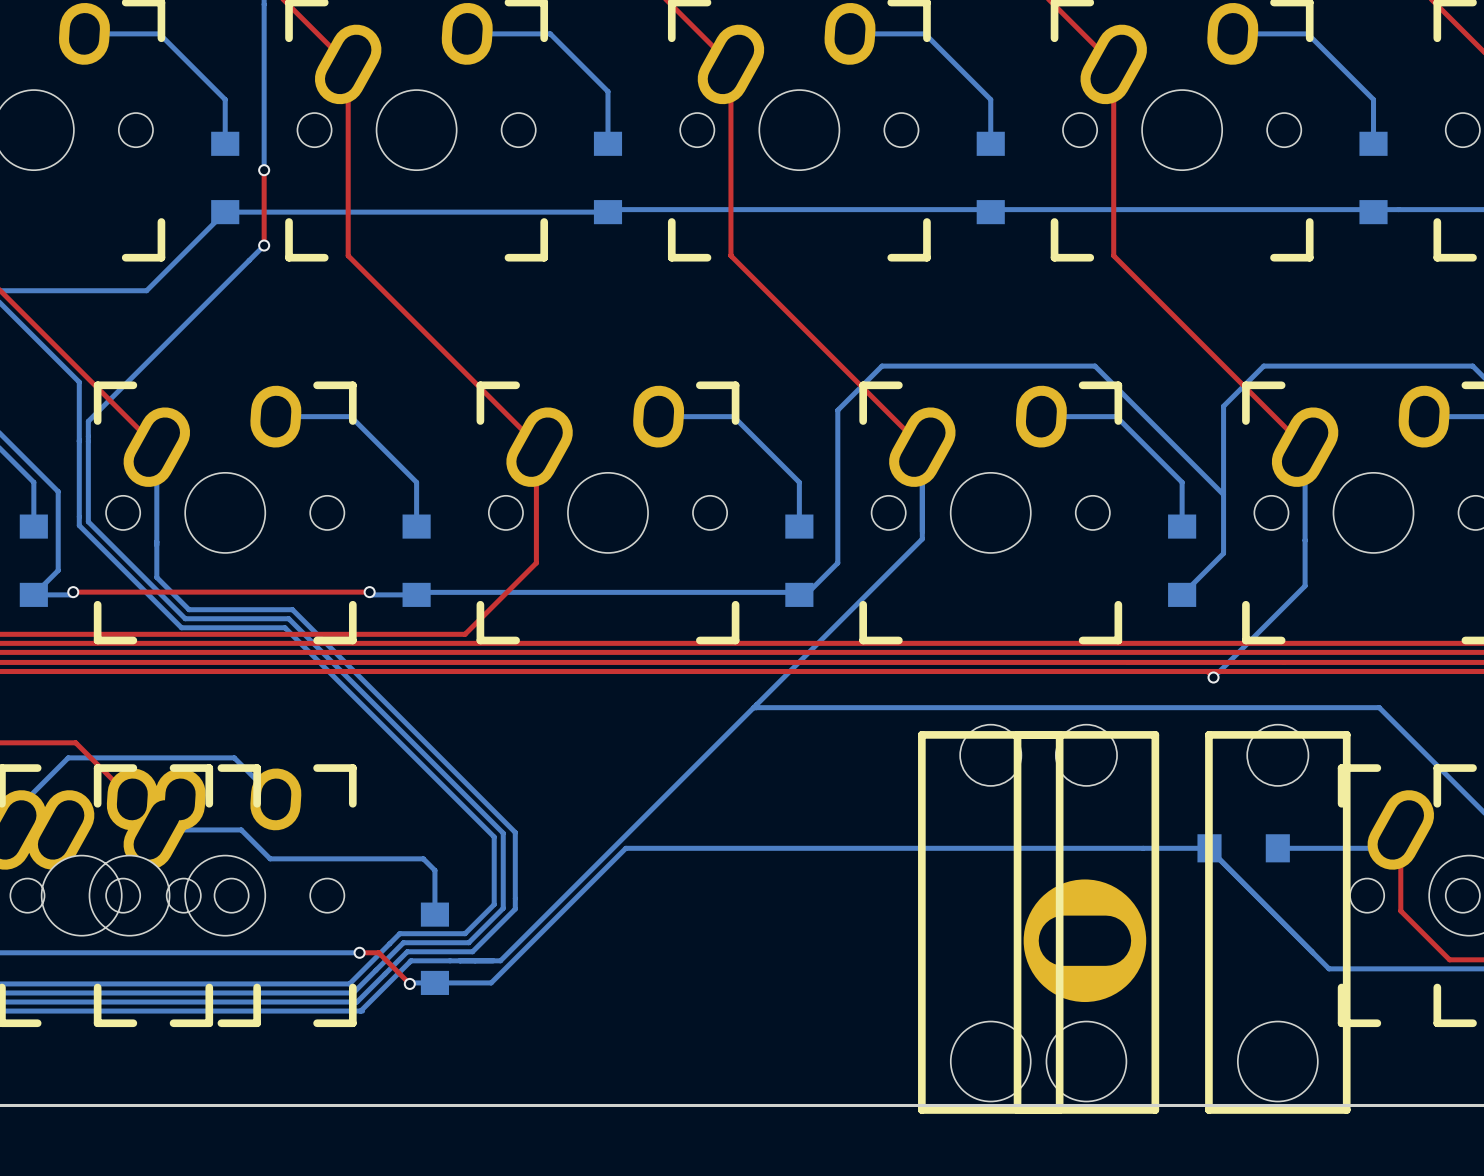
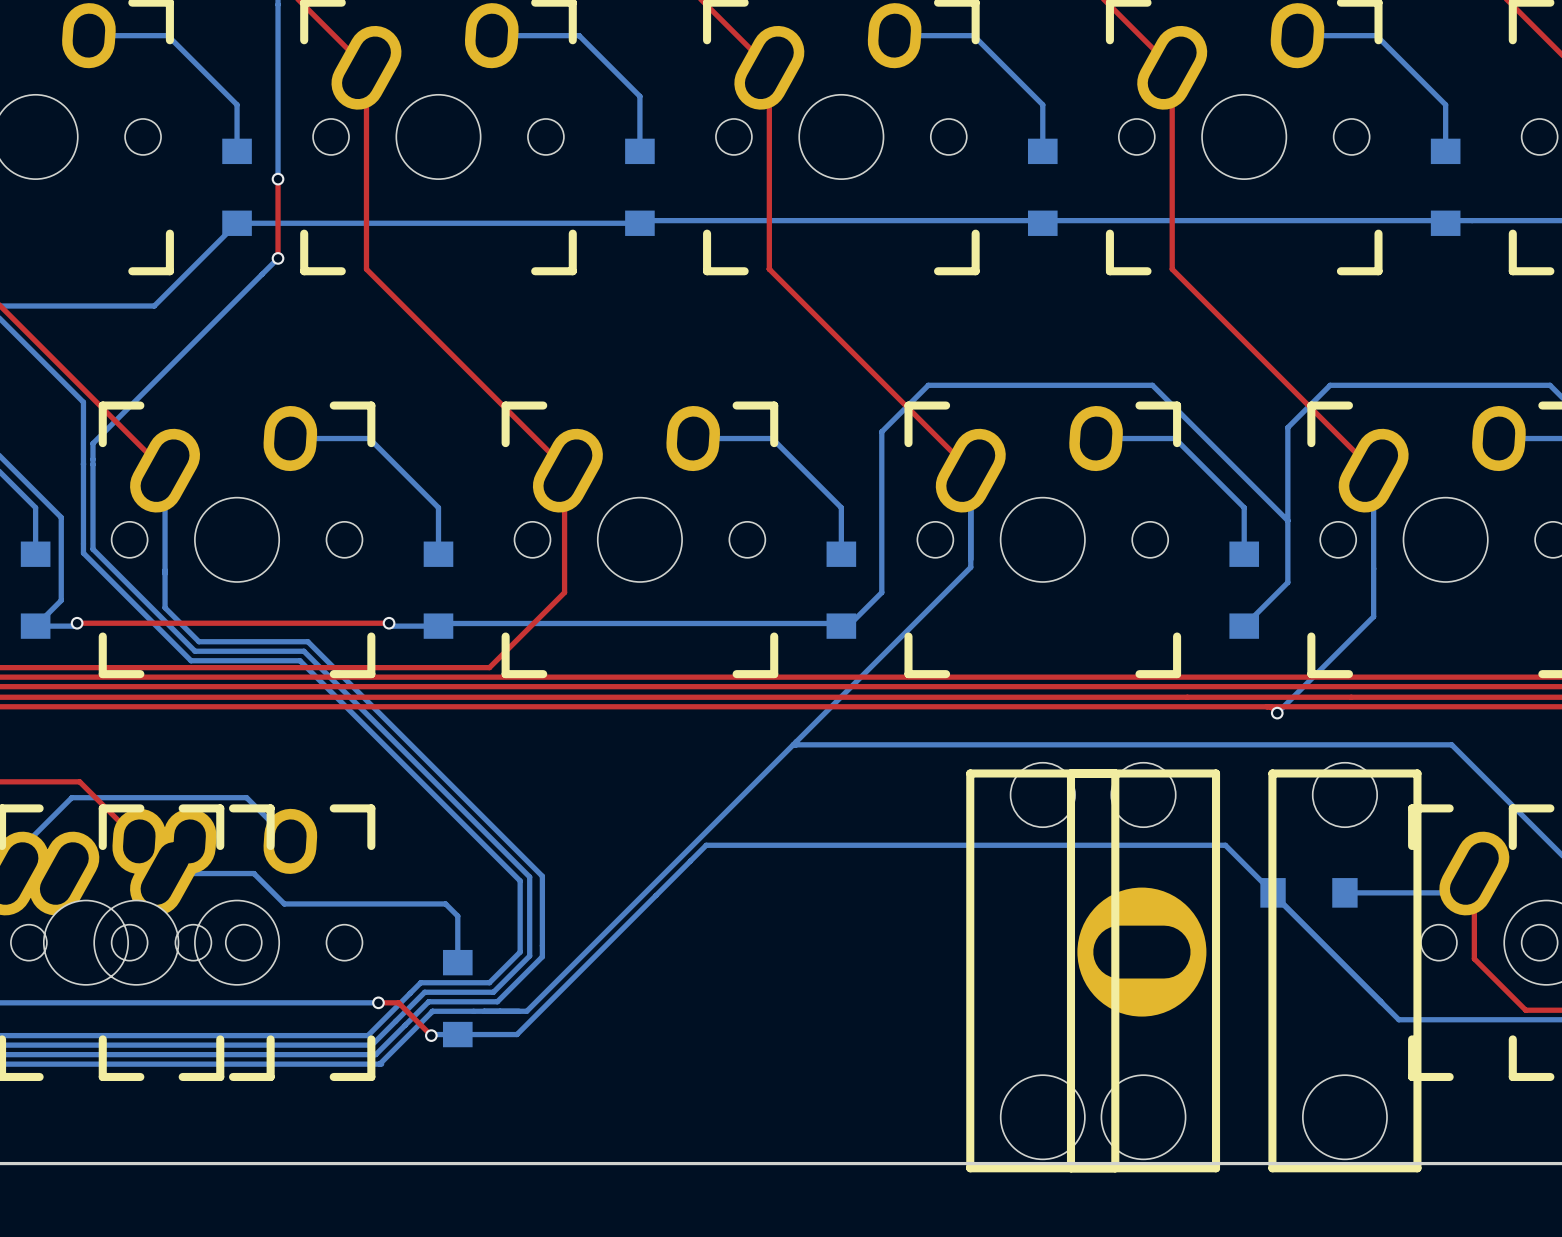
bottom track: (625, 848) (1209, 848) -> (658, 892) (706, 845) (1225, 845) (1273, 892)
part position: (1084, 940) -> (1141, 952)

